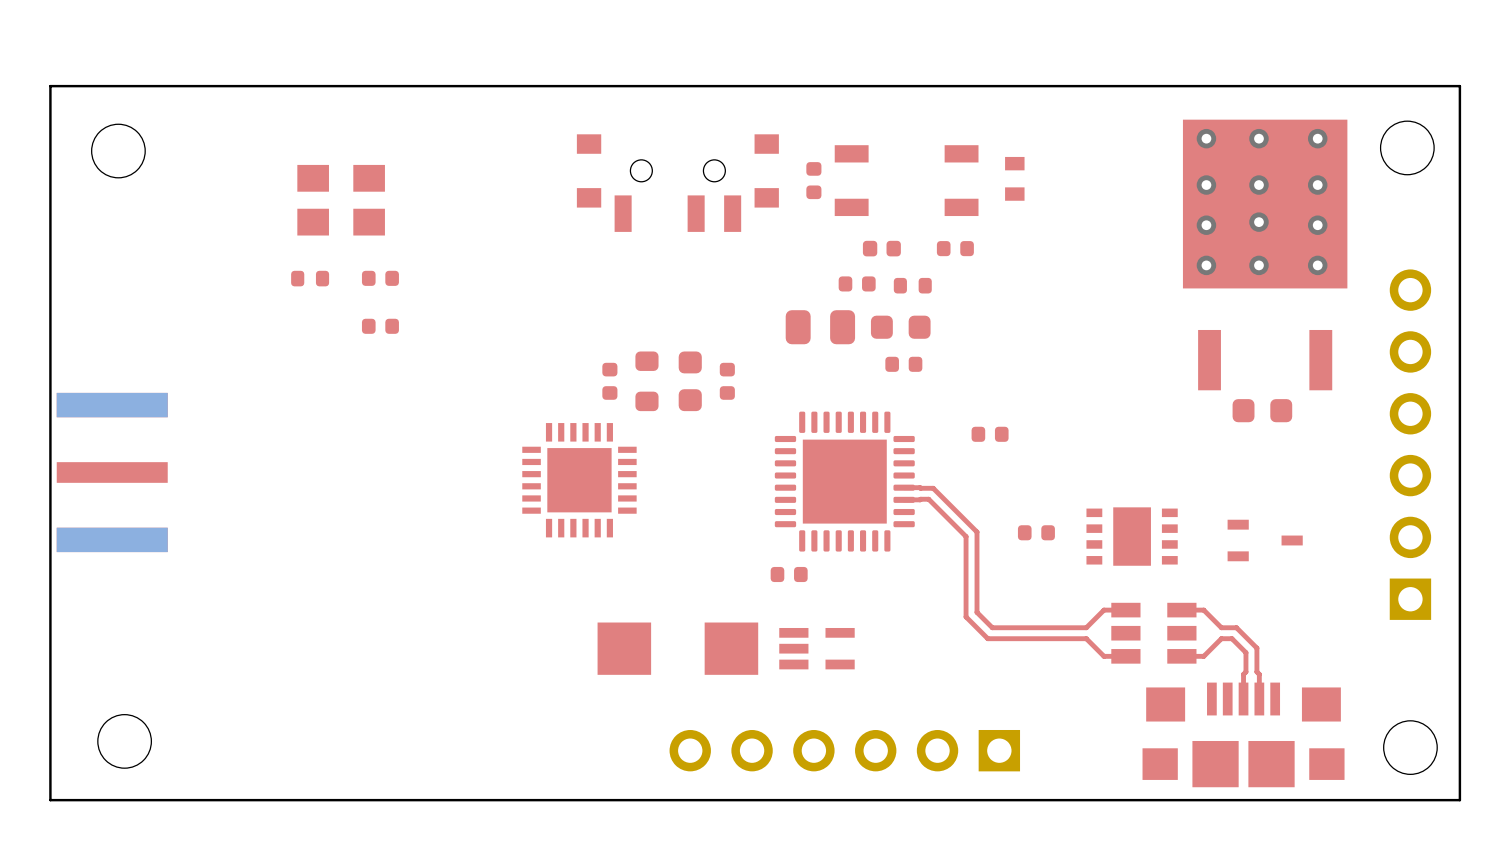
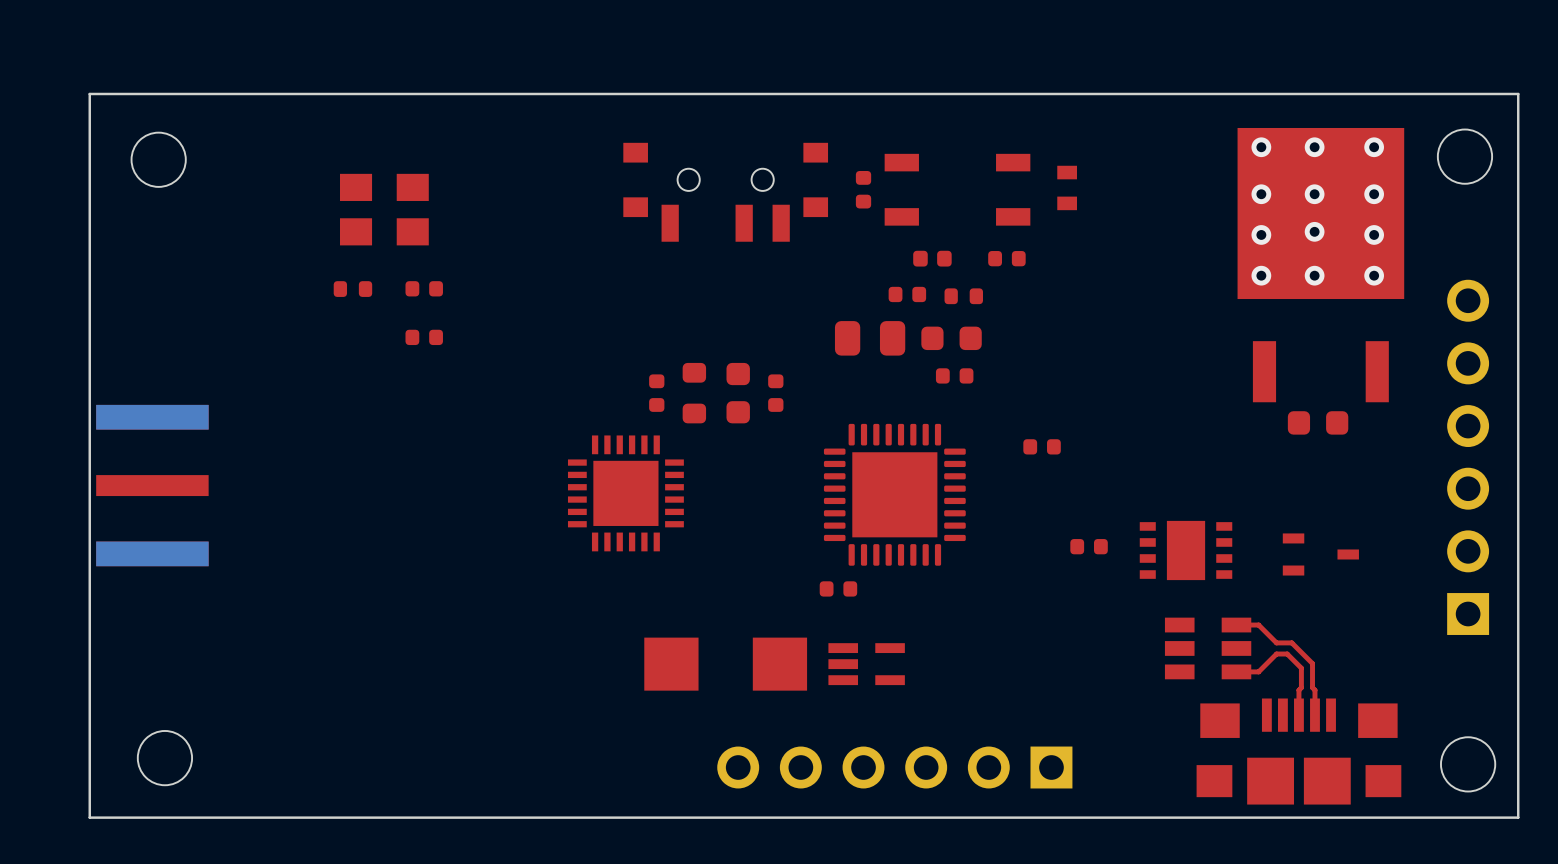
top track: (904, 487) (933, 488) (977, 532) (977, 612) (992, 627) (1086, 627) (1104, 610) (1125, 610) -> none
top track: (904, 499) (928, 499) (966, 536) (966, 616) (987, 638) (1086, 638) (1104, 656) (1125, 656) -> none

